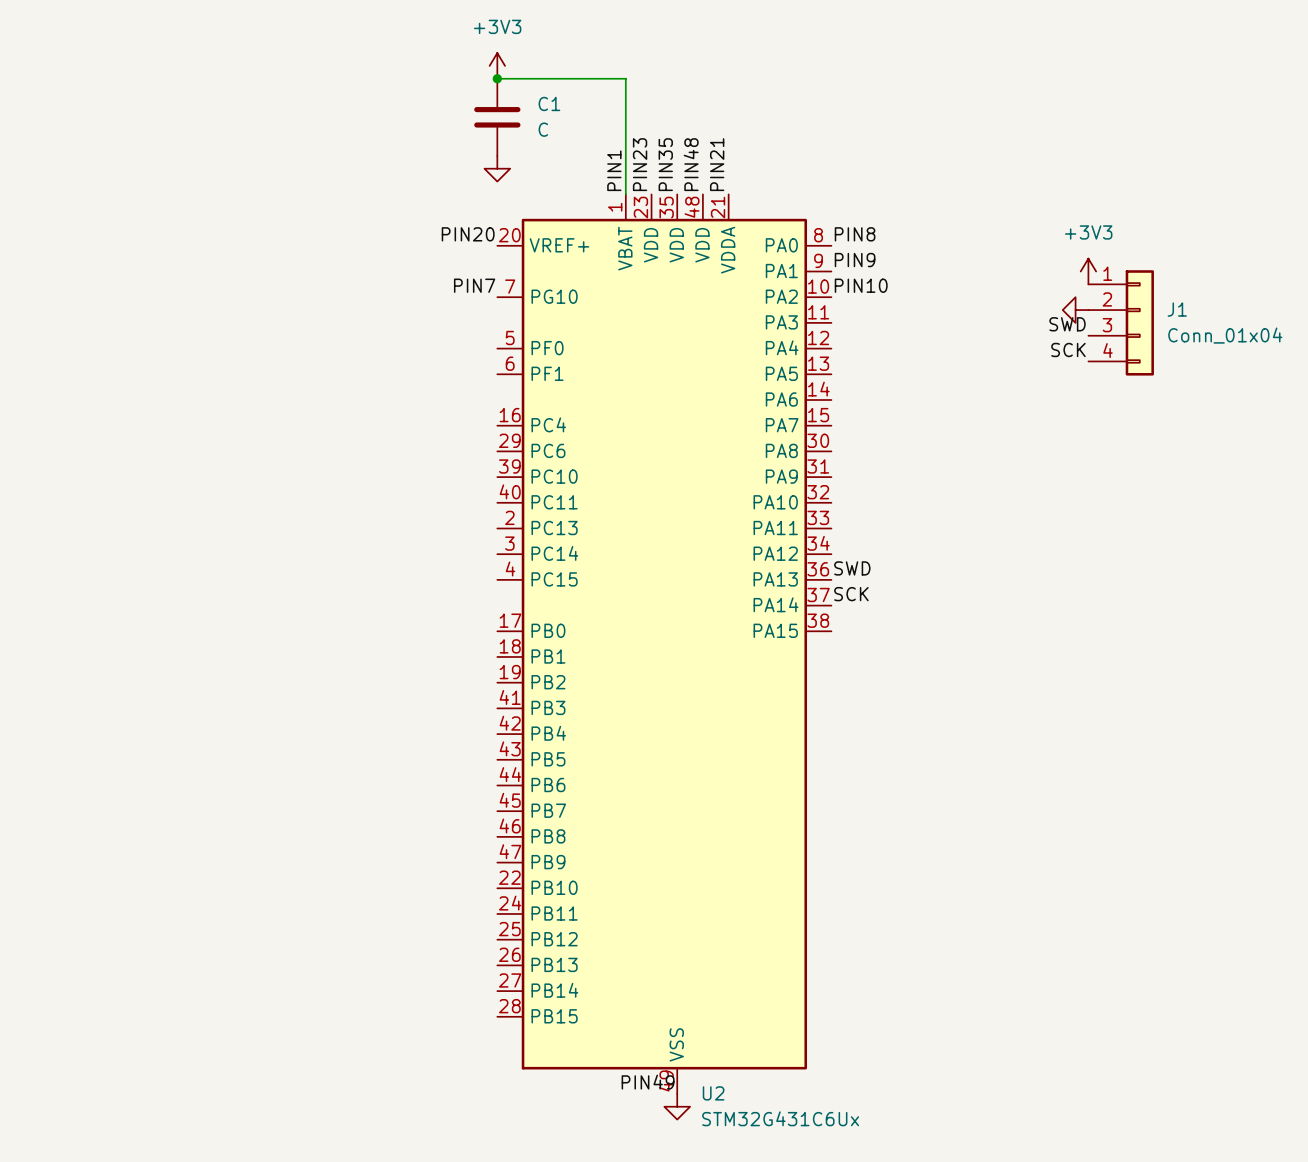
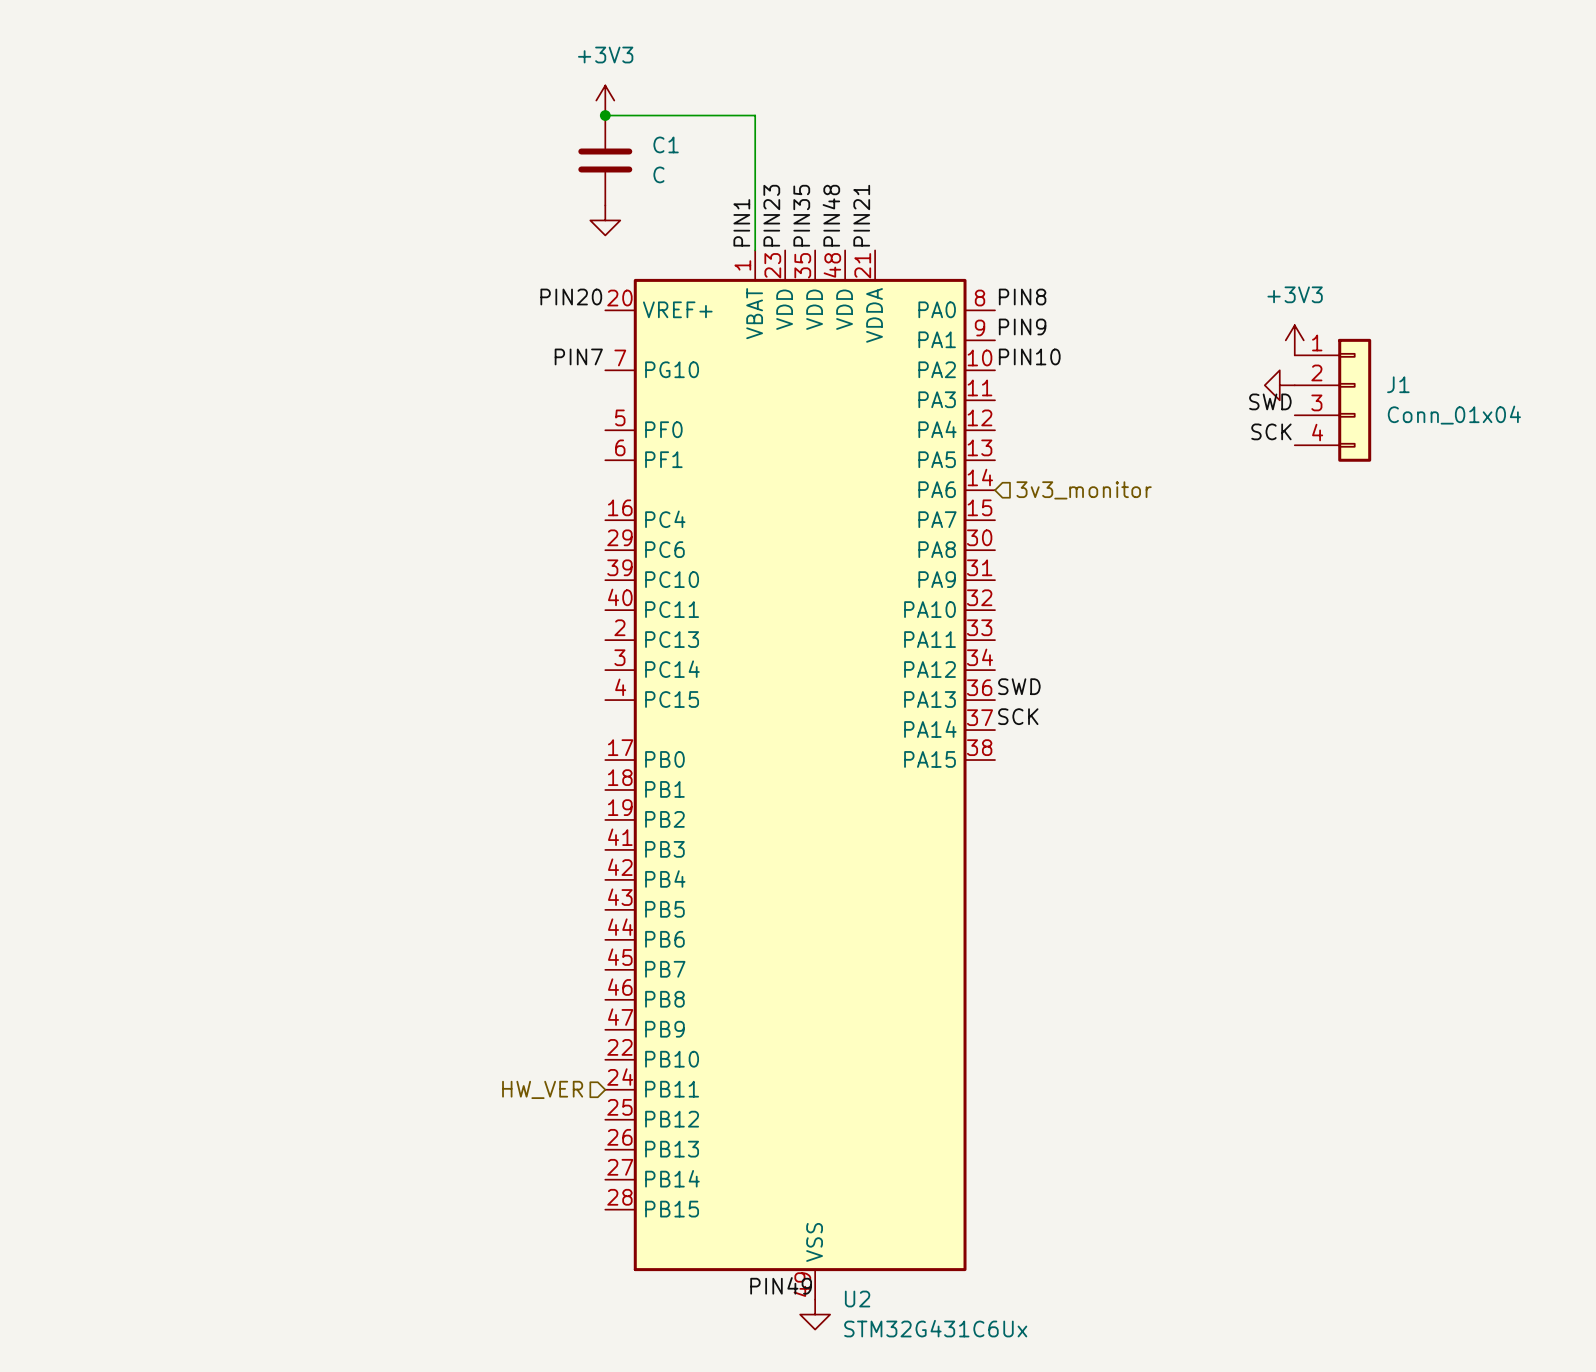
hierarchical label: none -> 3v3_monitor (1084, 490)
hierarchical label: none -> HW_VER (542, 1089)

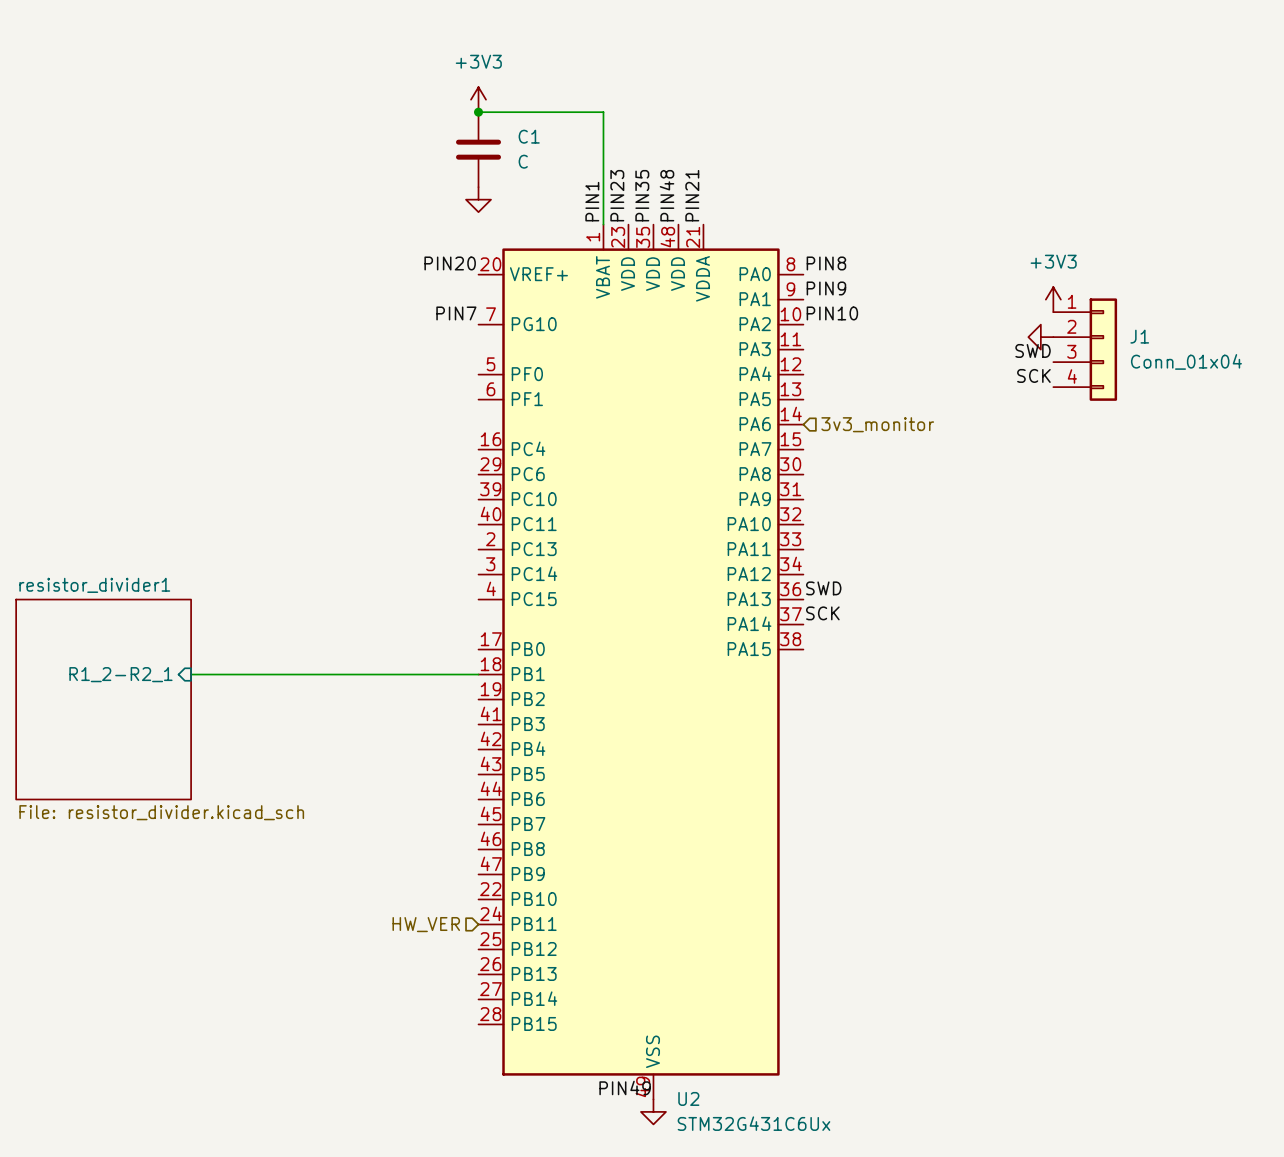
wire: none -> (191, 674) (478, 674)
sheet pin: none -> R1_2-R2_1 (120, 674)
sheet resistor_divider1: none -> File: resistor_divider.kicad_sch (103, 699)

